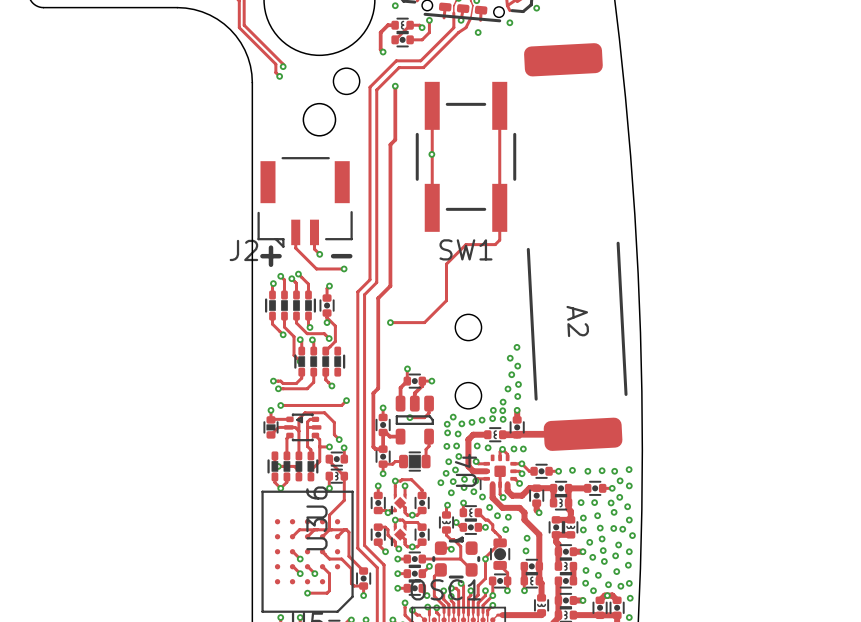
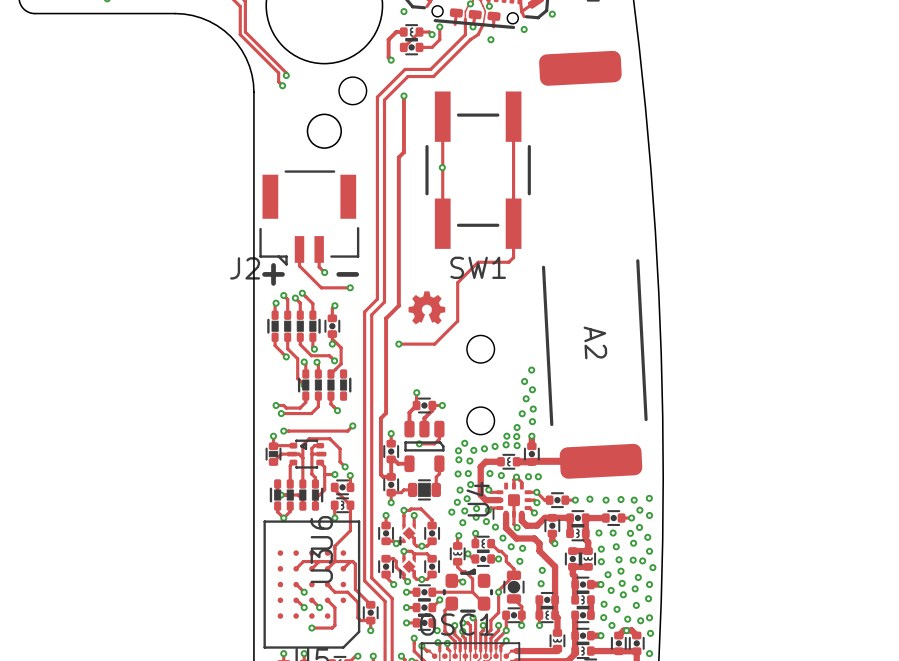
drawing: none -> [408, 291, 446, 325]

